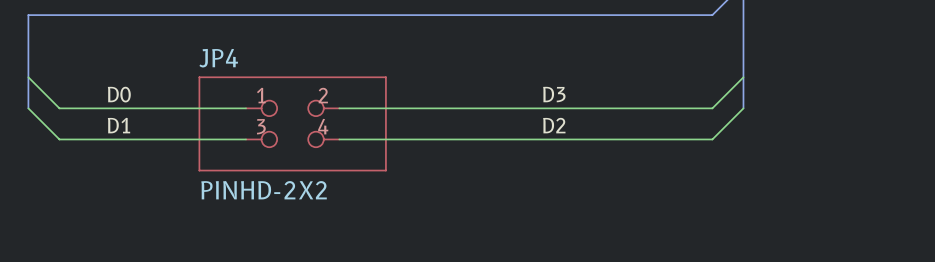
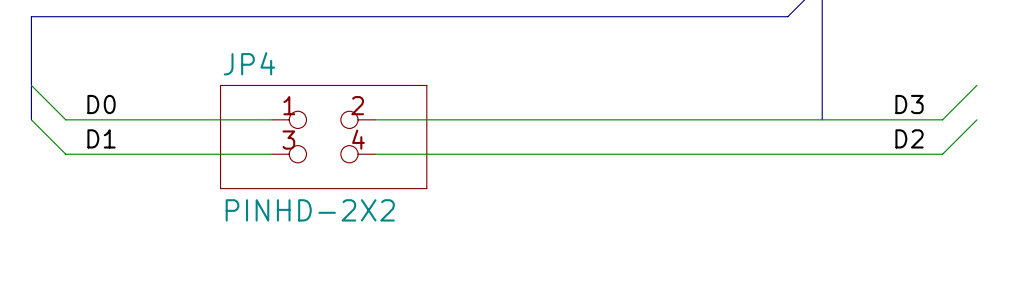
wire: (743, 77) (712, 108) -> (976, 85) (942, 119) (787, 119)
label position: D0 (119, 94) -> D0 (101, 104)
label position: D3 (554, 94) -> D3 (909, 104)
wire: (743, 108) (712, 139) -> (976, 119) (942, 154) (787, 154)
label position: D1 (119, 125) -> D1 (101, 138)
label position: D2 (554, 125) -> D2 (909, 138)

